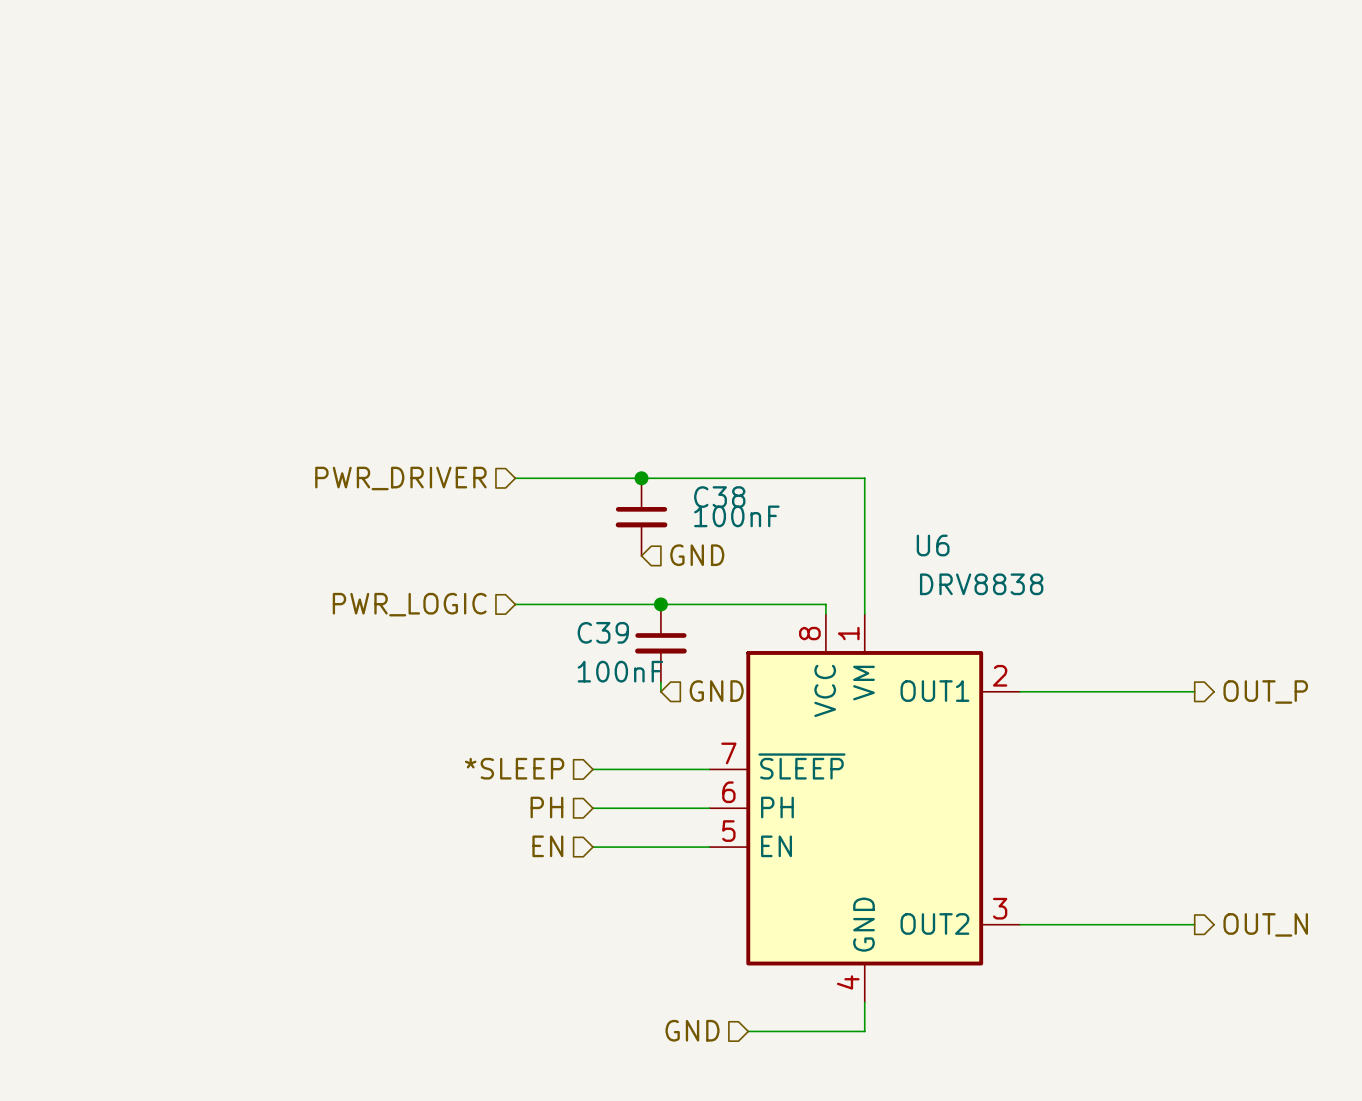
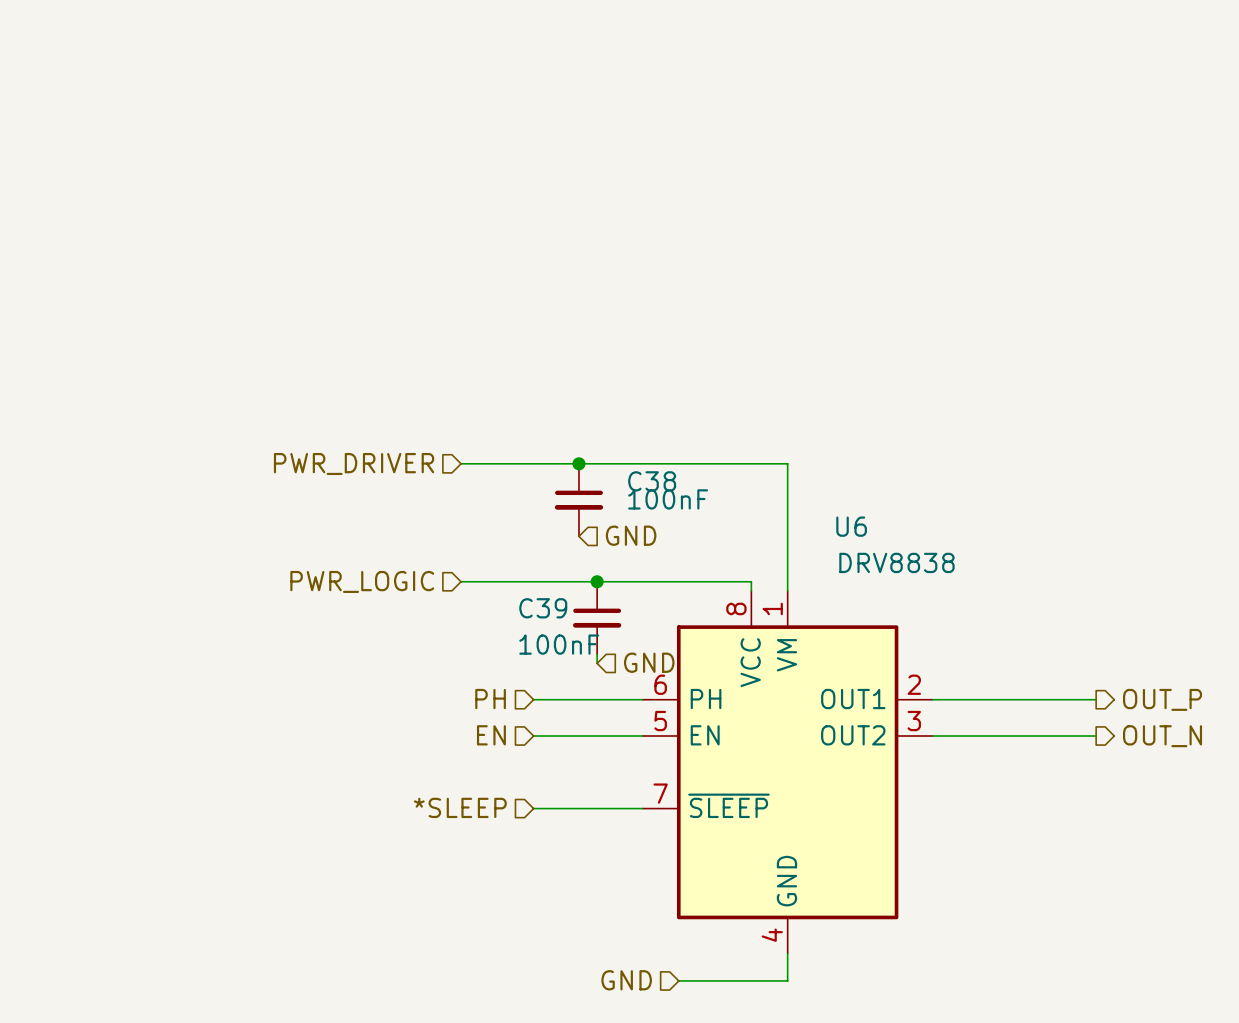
U6 symbol: [709, 614, 1021, 1003] -> [642, 590, 933, 954]
wire: (1020, 691) (1194, 691) -> (932, 699) (1096, 699)
hierarchical label position: OUT_P (1265, 691) -> OUT_P (1162, 699)
hierarchical label: *SLEEP (514, 768) -> EN (491, 735)
hierarchical label position: PH (546, 807) -> PH (490, 699)
wire: (593, 808) (709, 808) -> (533, 699) (642, 699)
hierarchical label: EN (547, 846) -> *SLEEP (460, 807)
wire: (1020, 924) (1194, 924) -> (932, 736) (1096, 736)
hierarchical label position: OUT_N (1265, 924) -> OUT_N (1162, 736)

